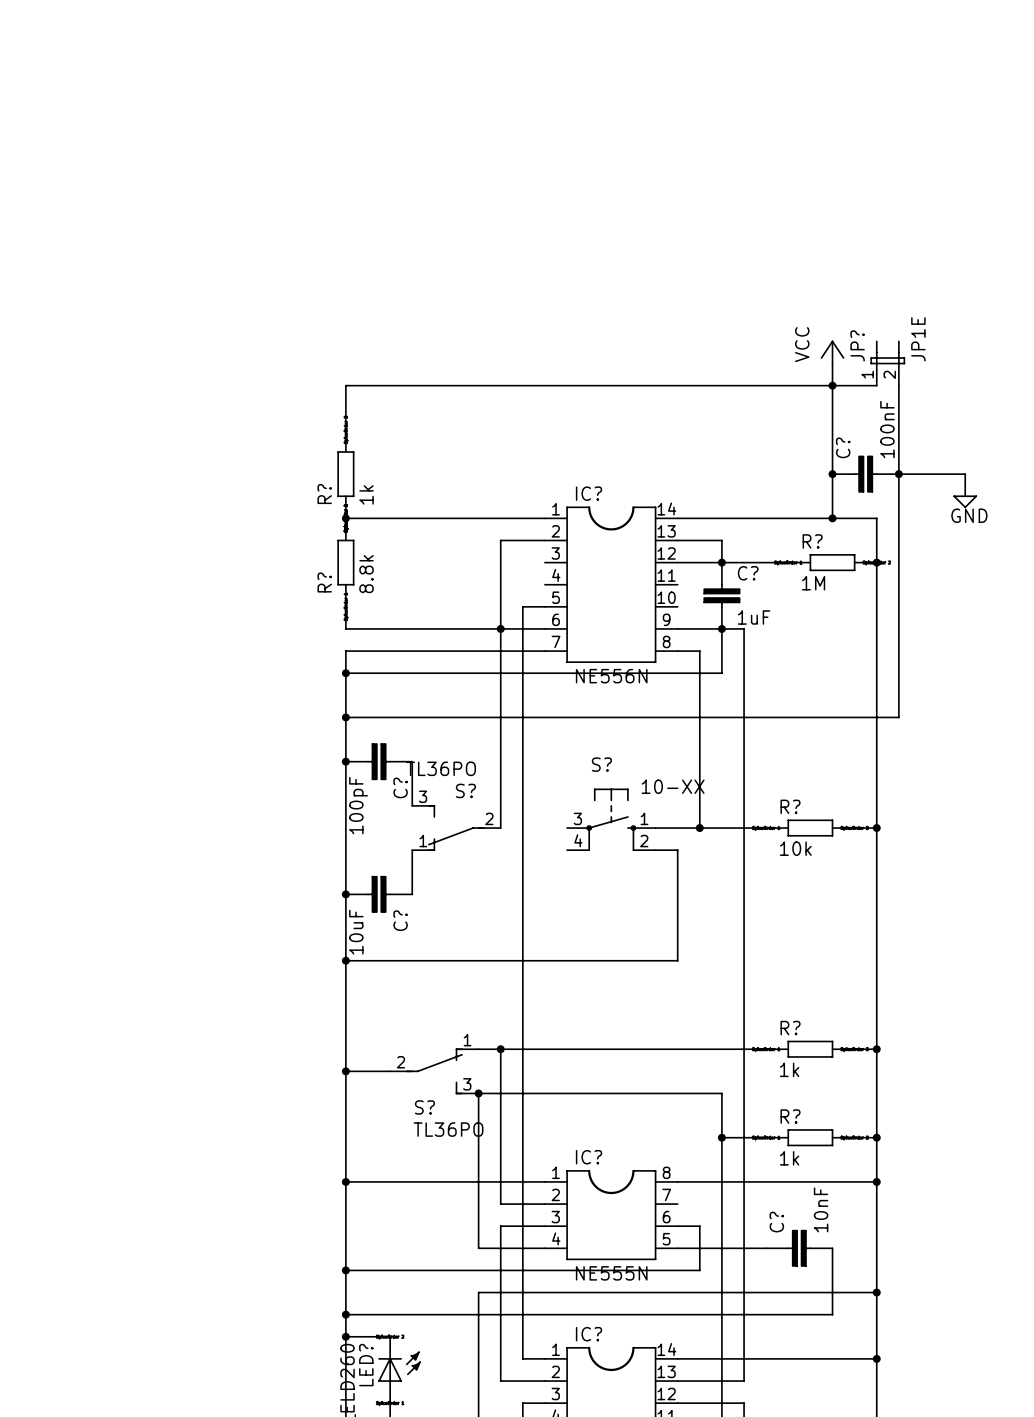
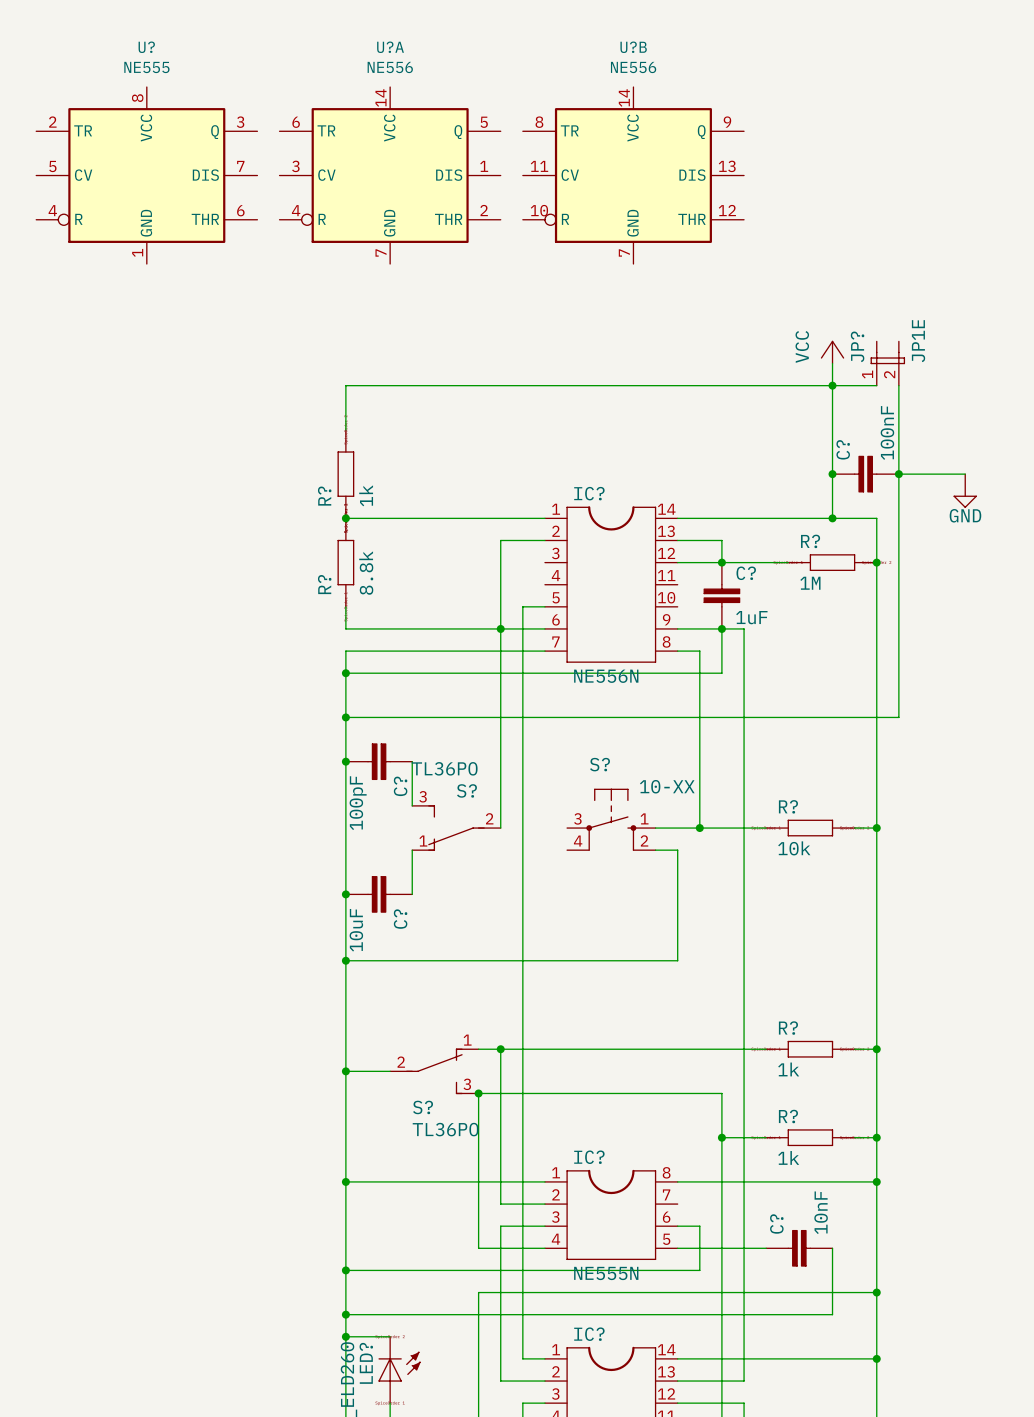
U?: none -> NE555 (146, 175)
U?A: none -> NE556 (390, 175)
U?B: none -> NE556 (633, 175)

